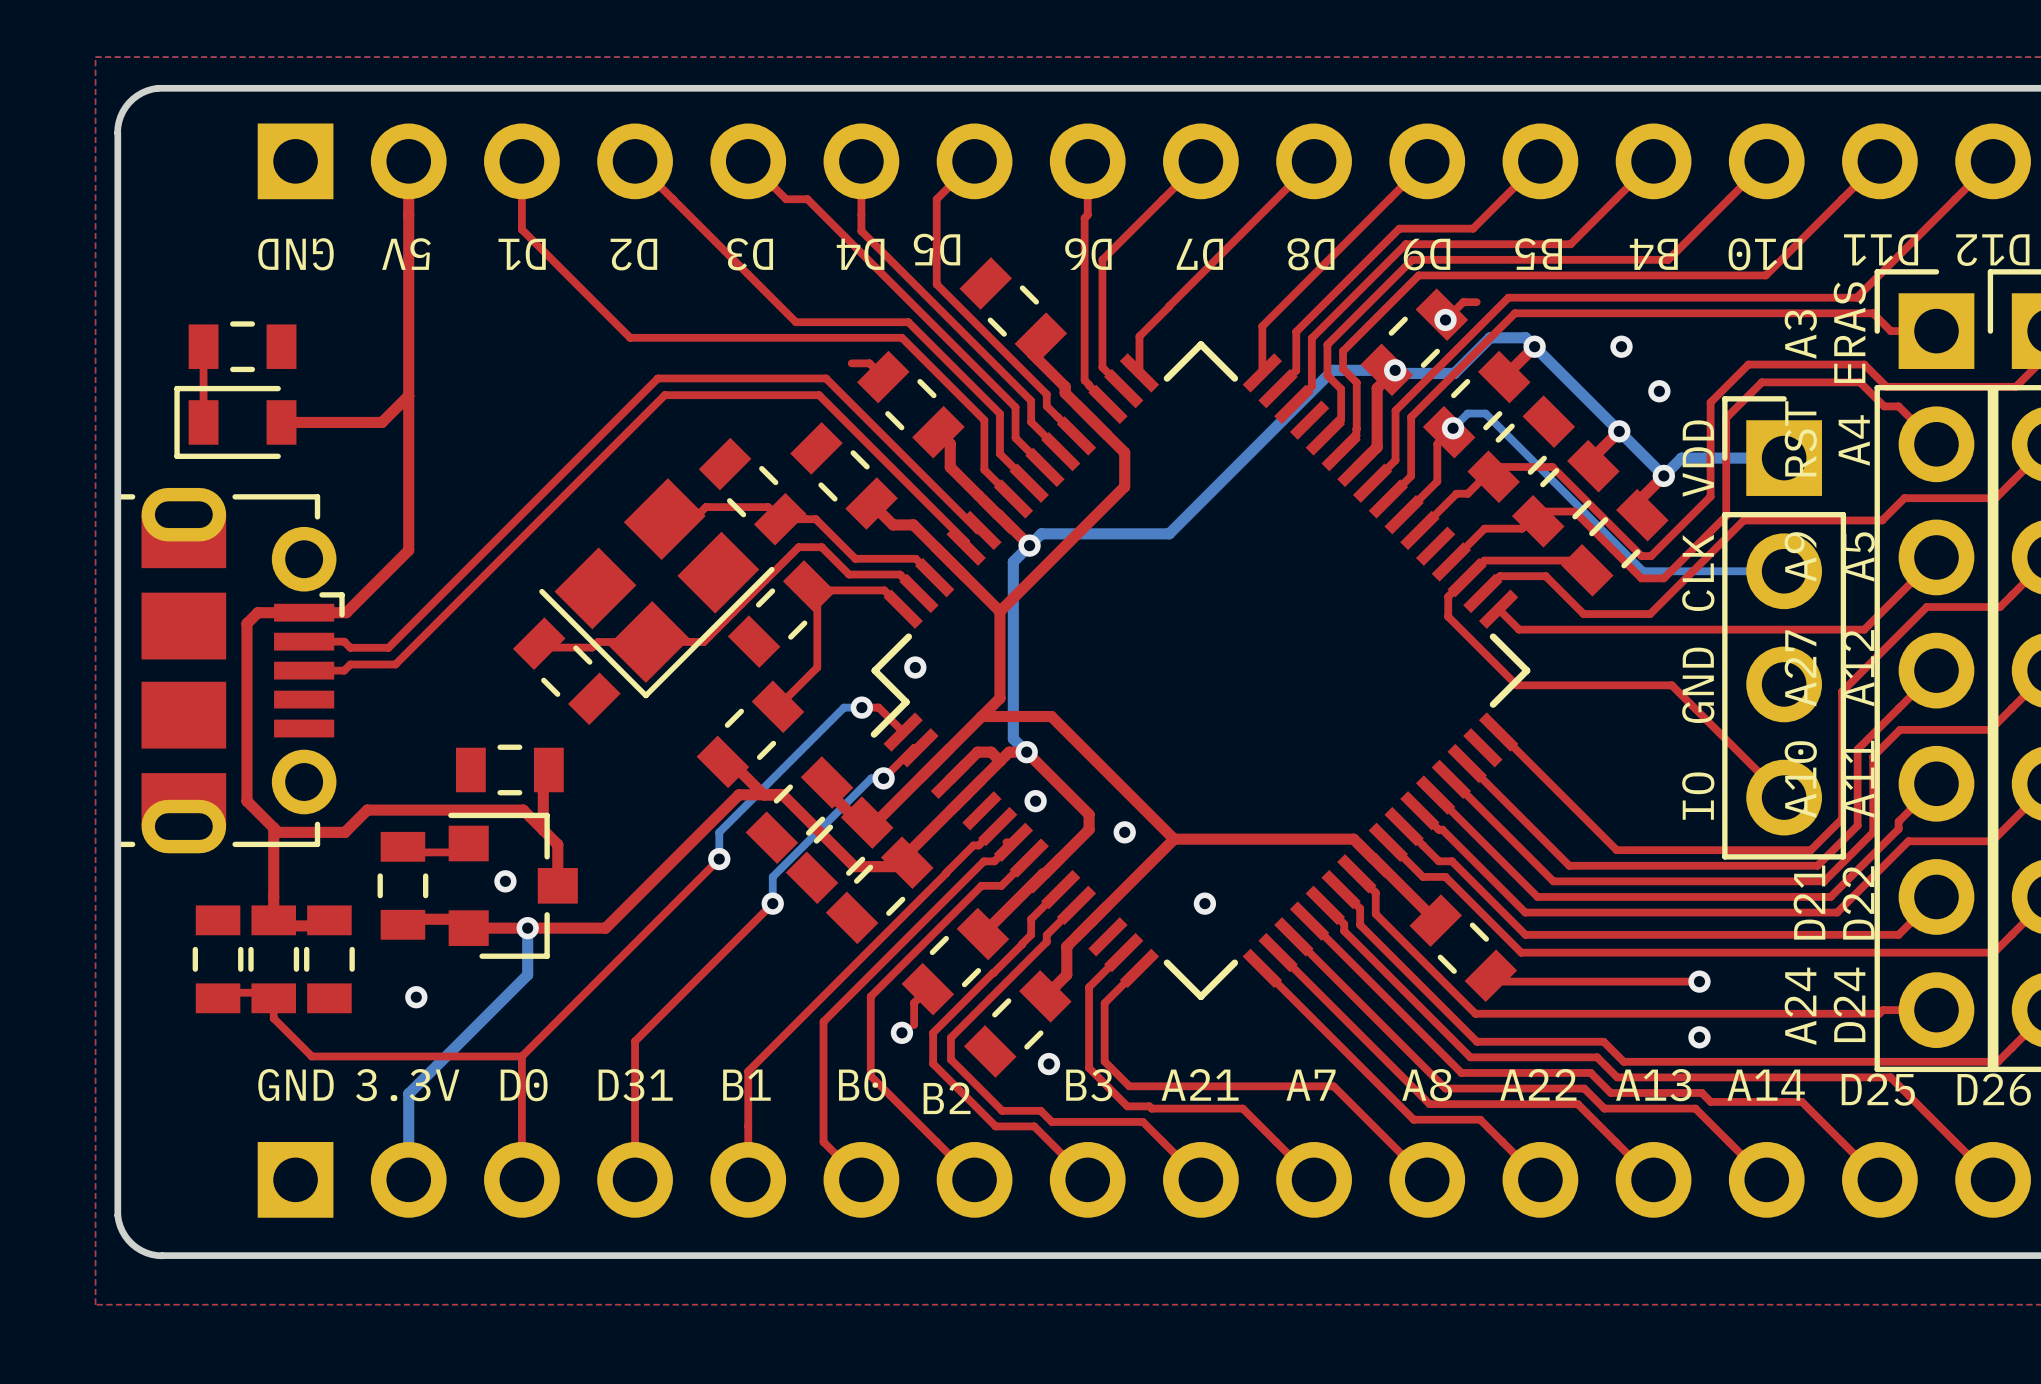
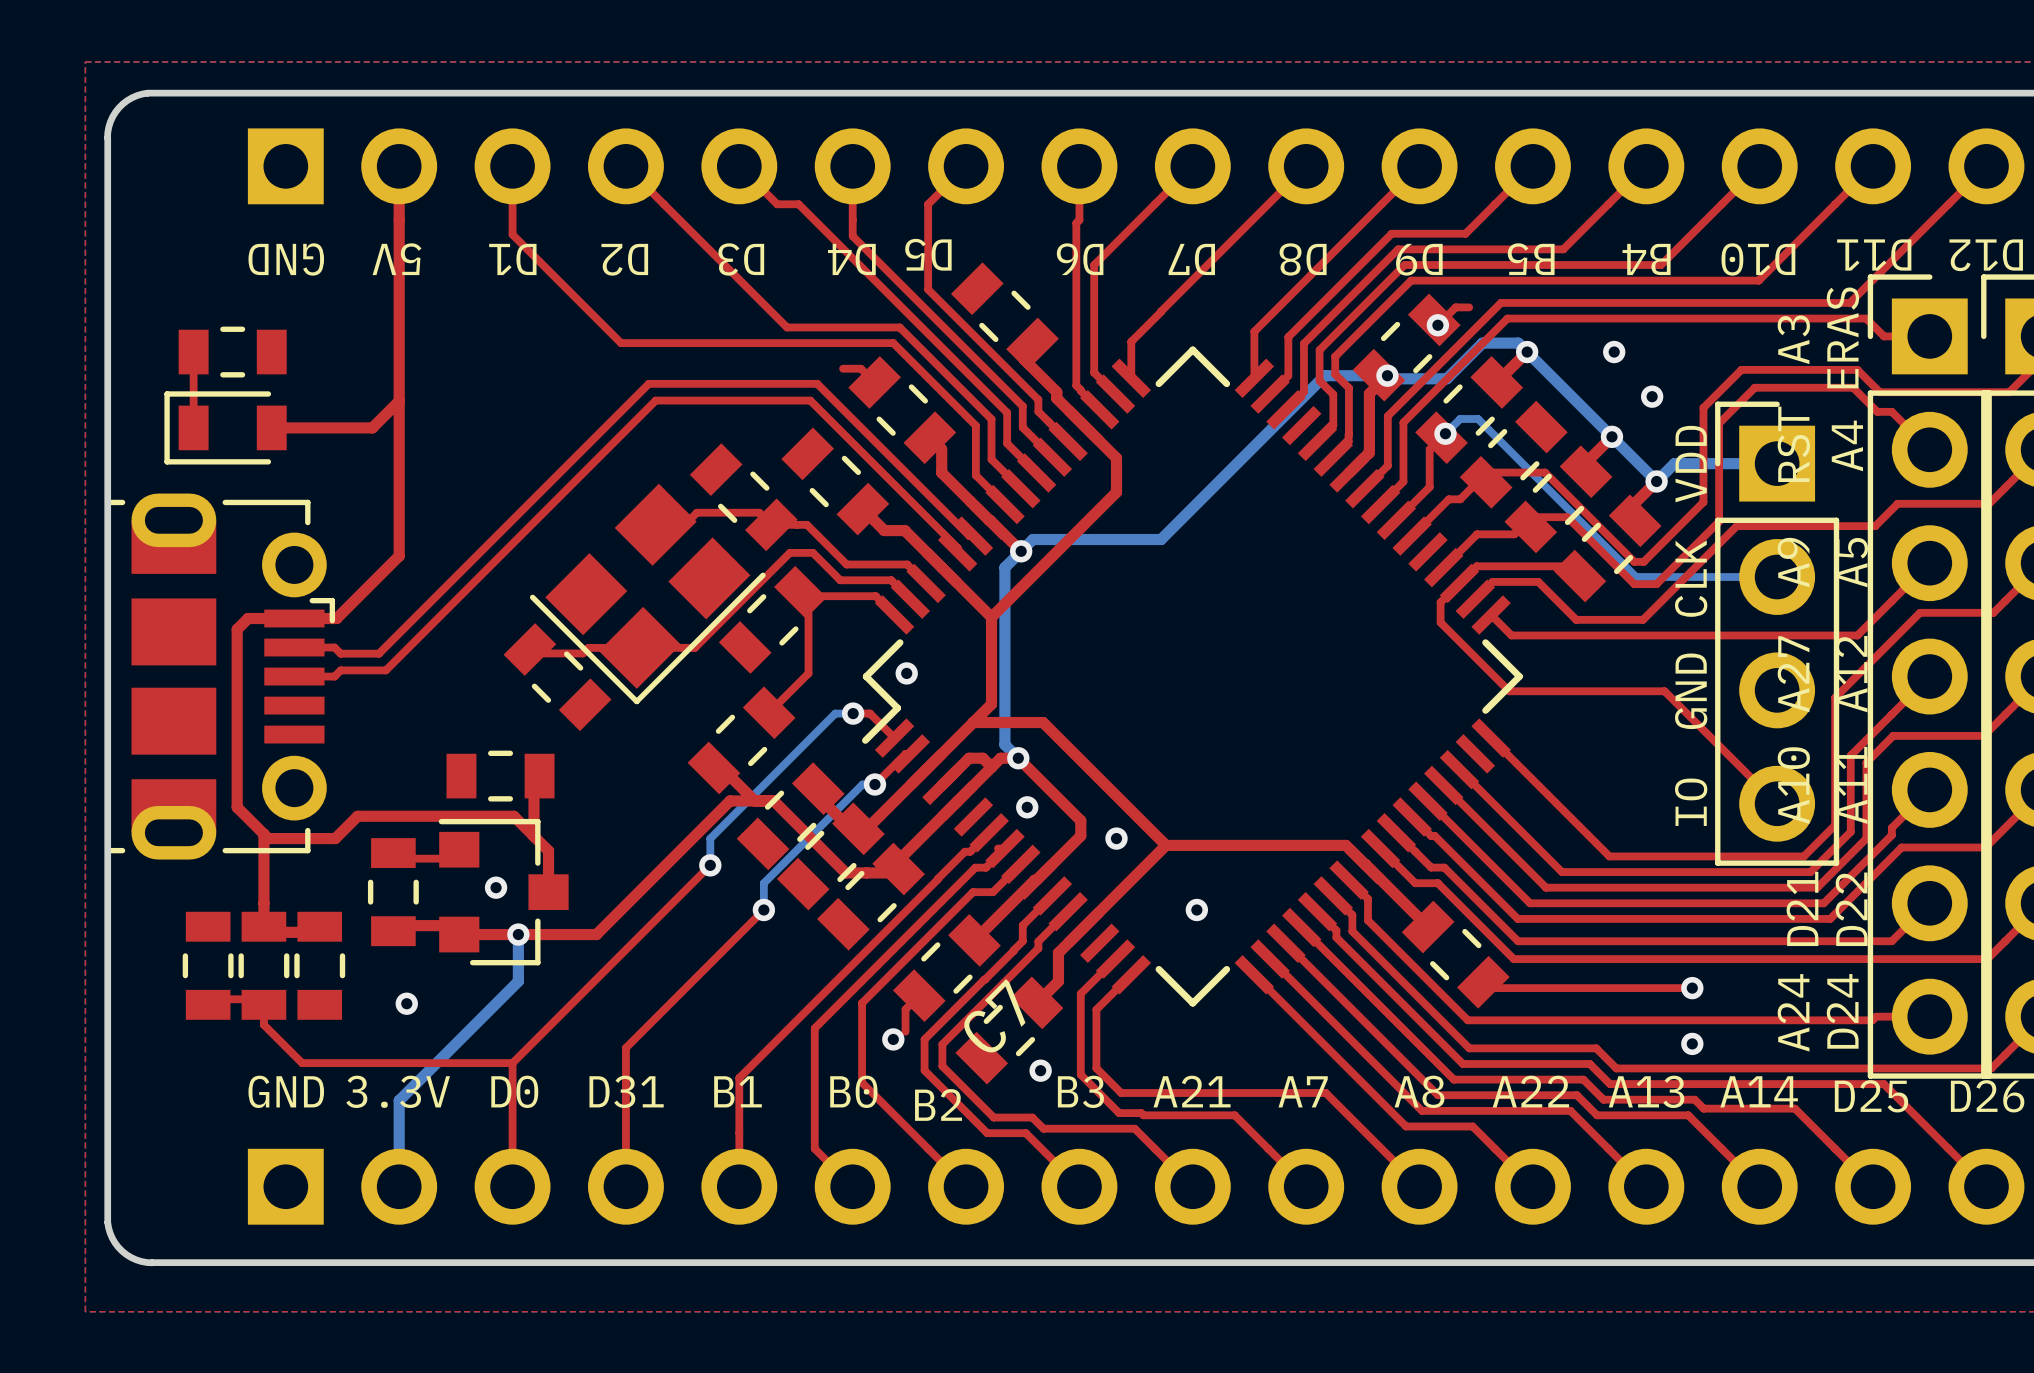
C7 name: none -> C7 (994, 1016)

